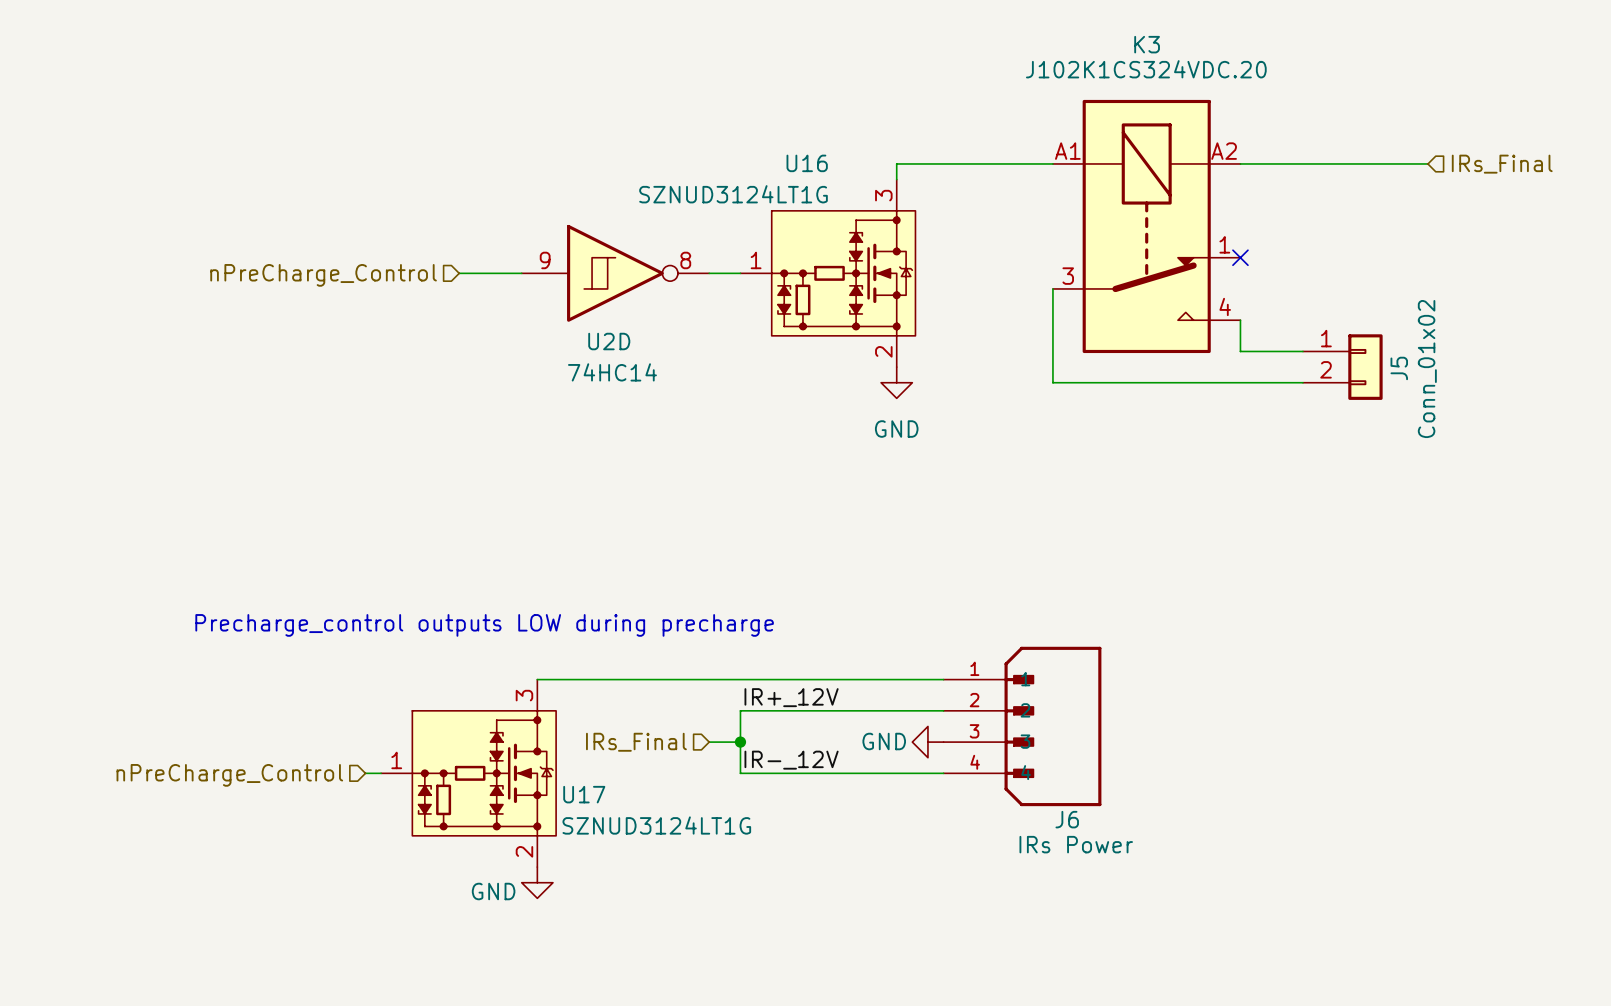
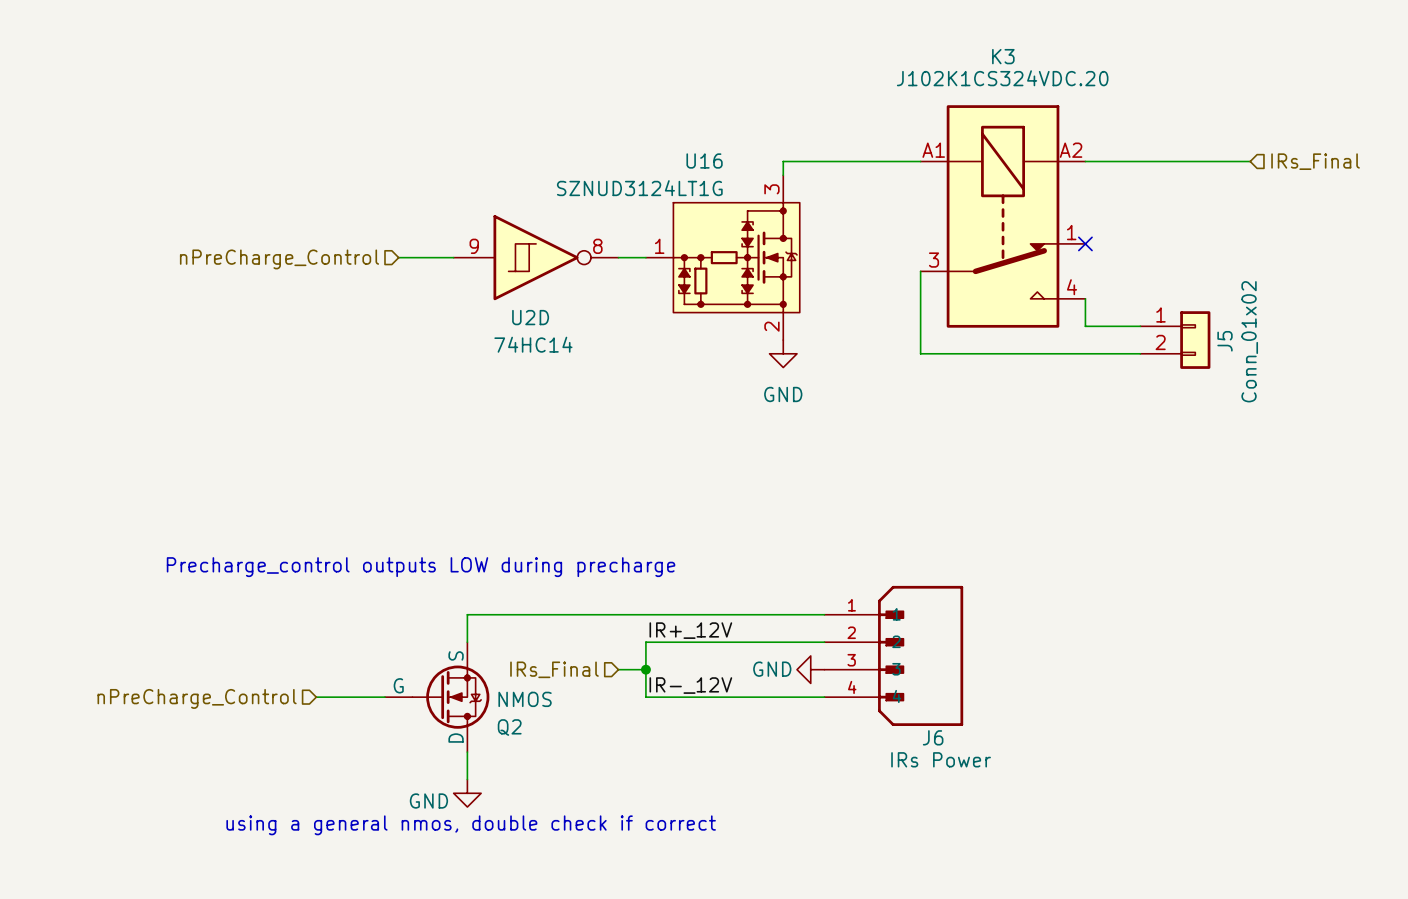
U17: SZNUD3124LT1G (468, 773) -> none
Q2: none -> NMOS (437, 697)
text: none -> using a general nmos, double check if correct (471, 825)

